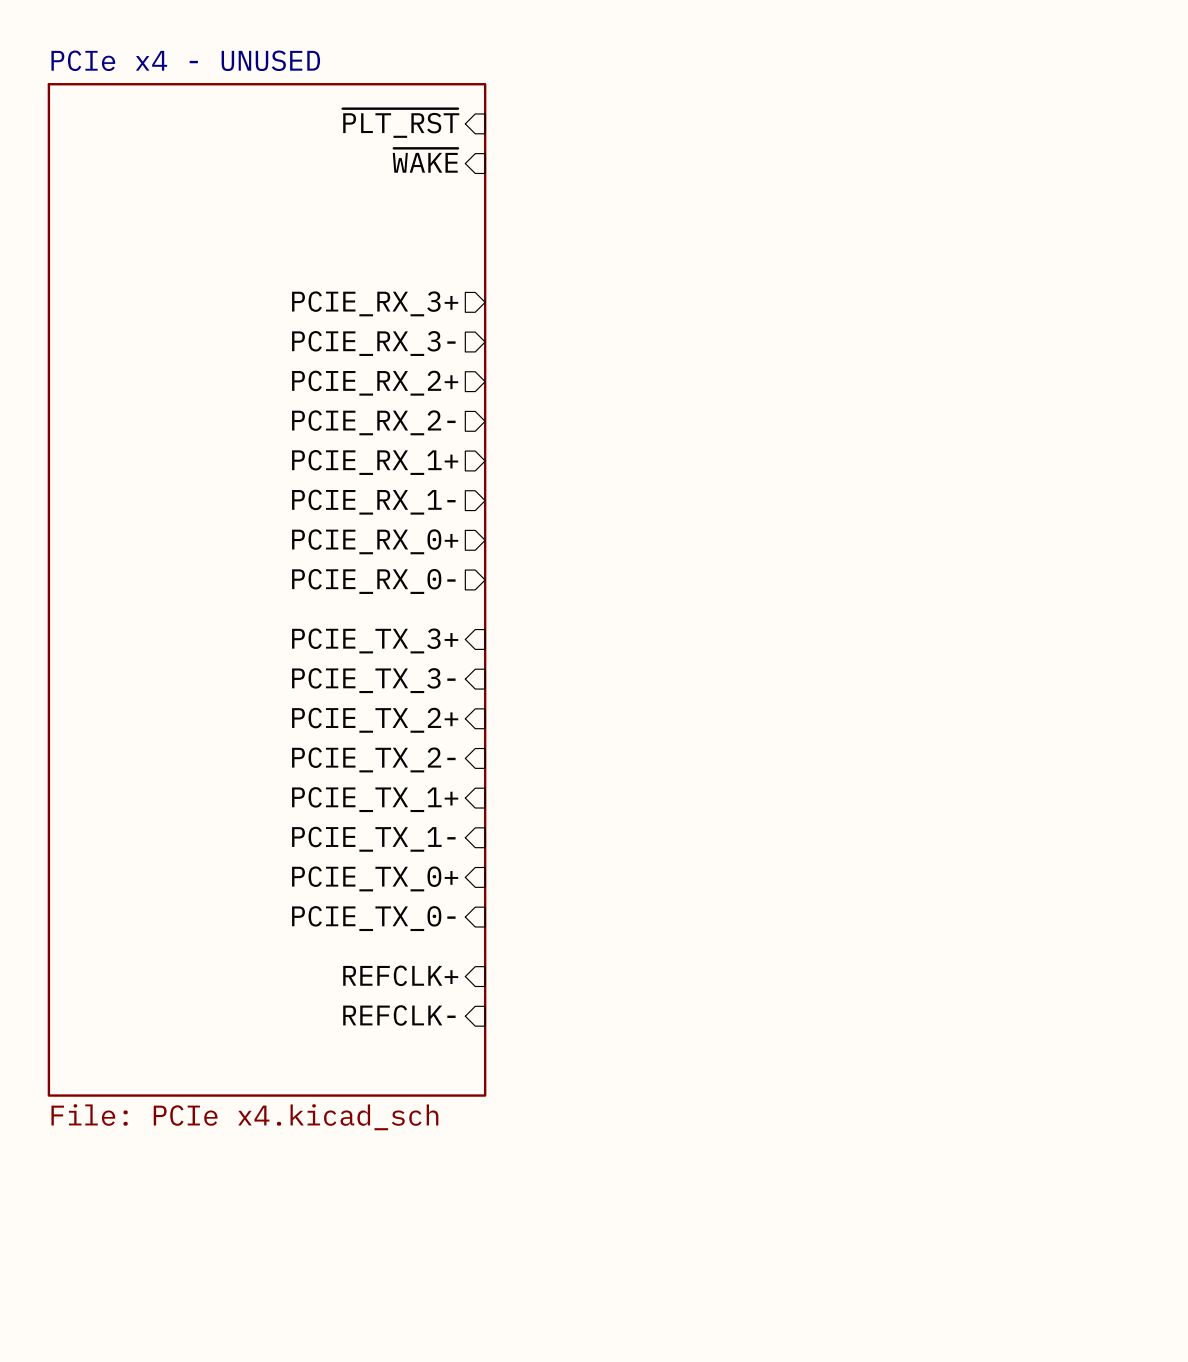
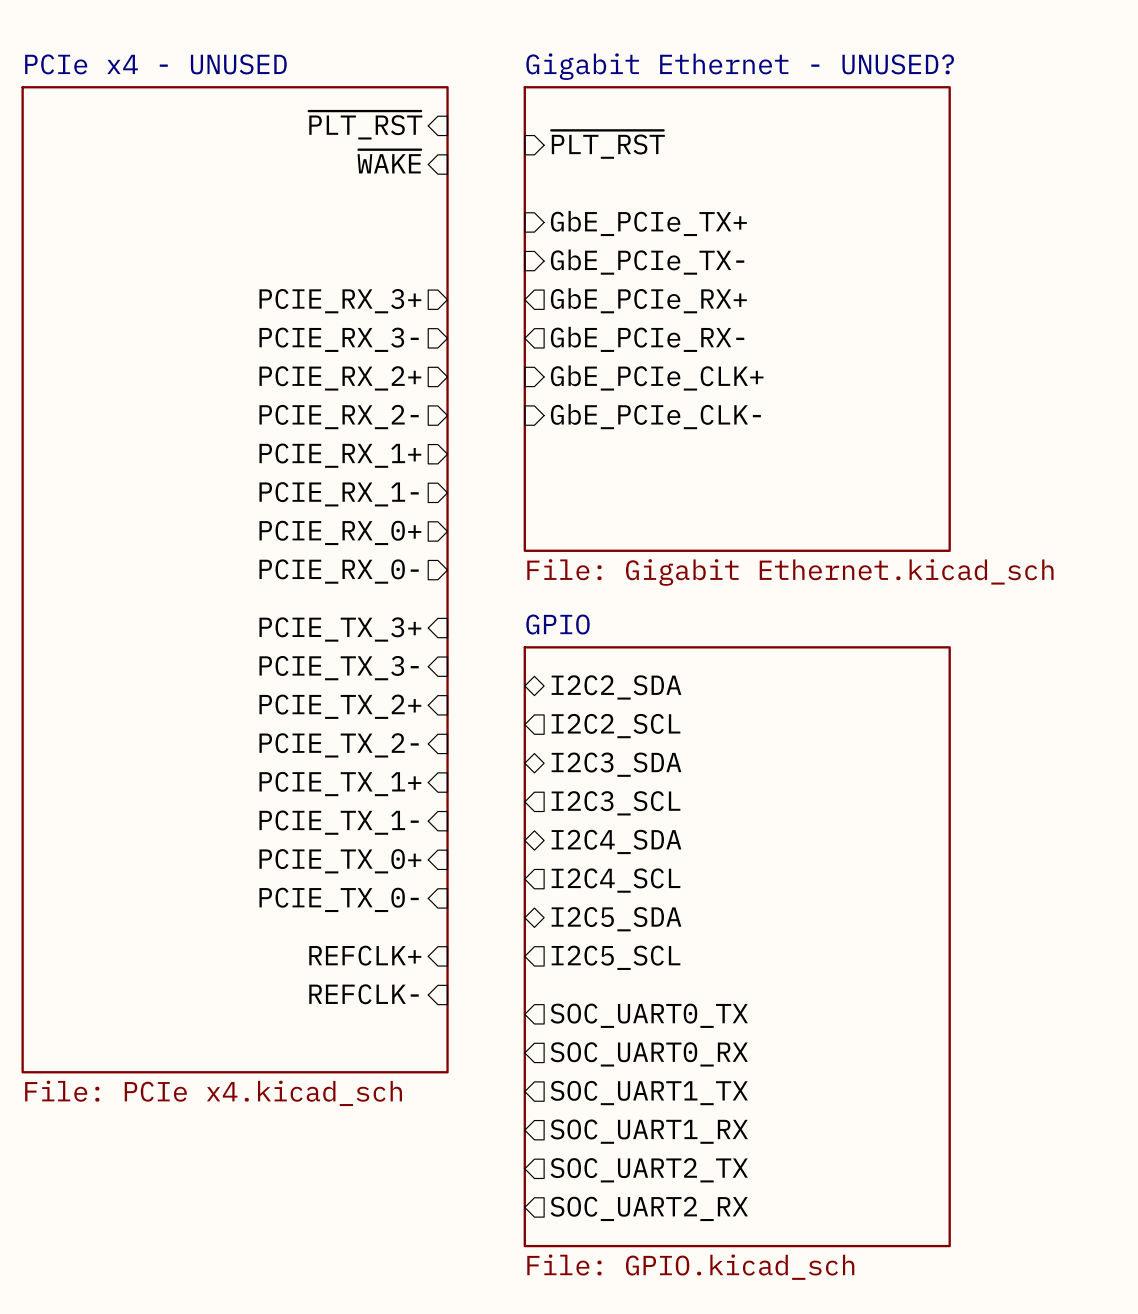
sheet pin: none -> ~{PLT_RST} (608, 144)
sheet pin: none -> GbE_PCIe_TX+ (648, 223)
sheet pin: none -> GbE_PCIe_TX- (647, 262)
sheet pin: none -> GbE_PCIe_RX+ (648, 300)
sheet Gigabit Ethernet - UNUSED?: none -> File: Gigabit Ethernet.kicad_sch (737, 319)
sheet pin: none -> GbE_PCIe_RX- (647, 339)
sheet pin: none -> GbE_PCIe_CLK+ (657, 378)
sheet pin: none -> GbE_PCIe_CLK- (655, 416)
sheet pin: none -> I2C2_SDA (616, 687)
sheet pin: none -> I2C2_SCL (616, 726)
sheet pin: none -> I2C3_SDA (616, 764)
sheet pin: none -> I2C3_SCL (616, 803)
sheet pin: none -> I2C4_SDA (616, 841)
sheet pin: none -> I2C4_SCL (616, 880)
sheet pin: none -> I2C5_SDA (616, 919)
sheet GPIO: none -> File: GPIO.kicad_sch (737, 946)
sheet pin: none -> I2C5_SCL (616, 957)
sheet pin: none -> SOC_UART0_TX (649, 1015)
sheet pin: none -> SOC_UART0_RX (649, 1054)
sheet pin: none -> SOC_UART1_TX (649, 1093)
sheet pin: none -> SOC_UART1_RX (649, 1131)
sheet pin: none -> SOC_UART2_TX (649, 1170)
sheet pin: none -> SOC_UART2_RX (649, 1208)

